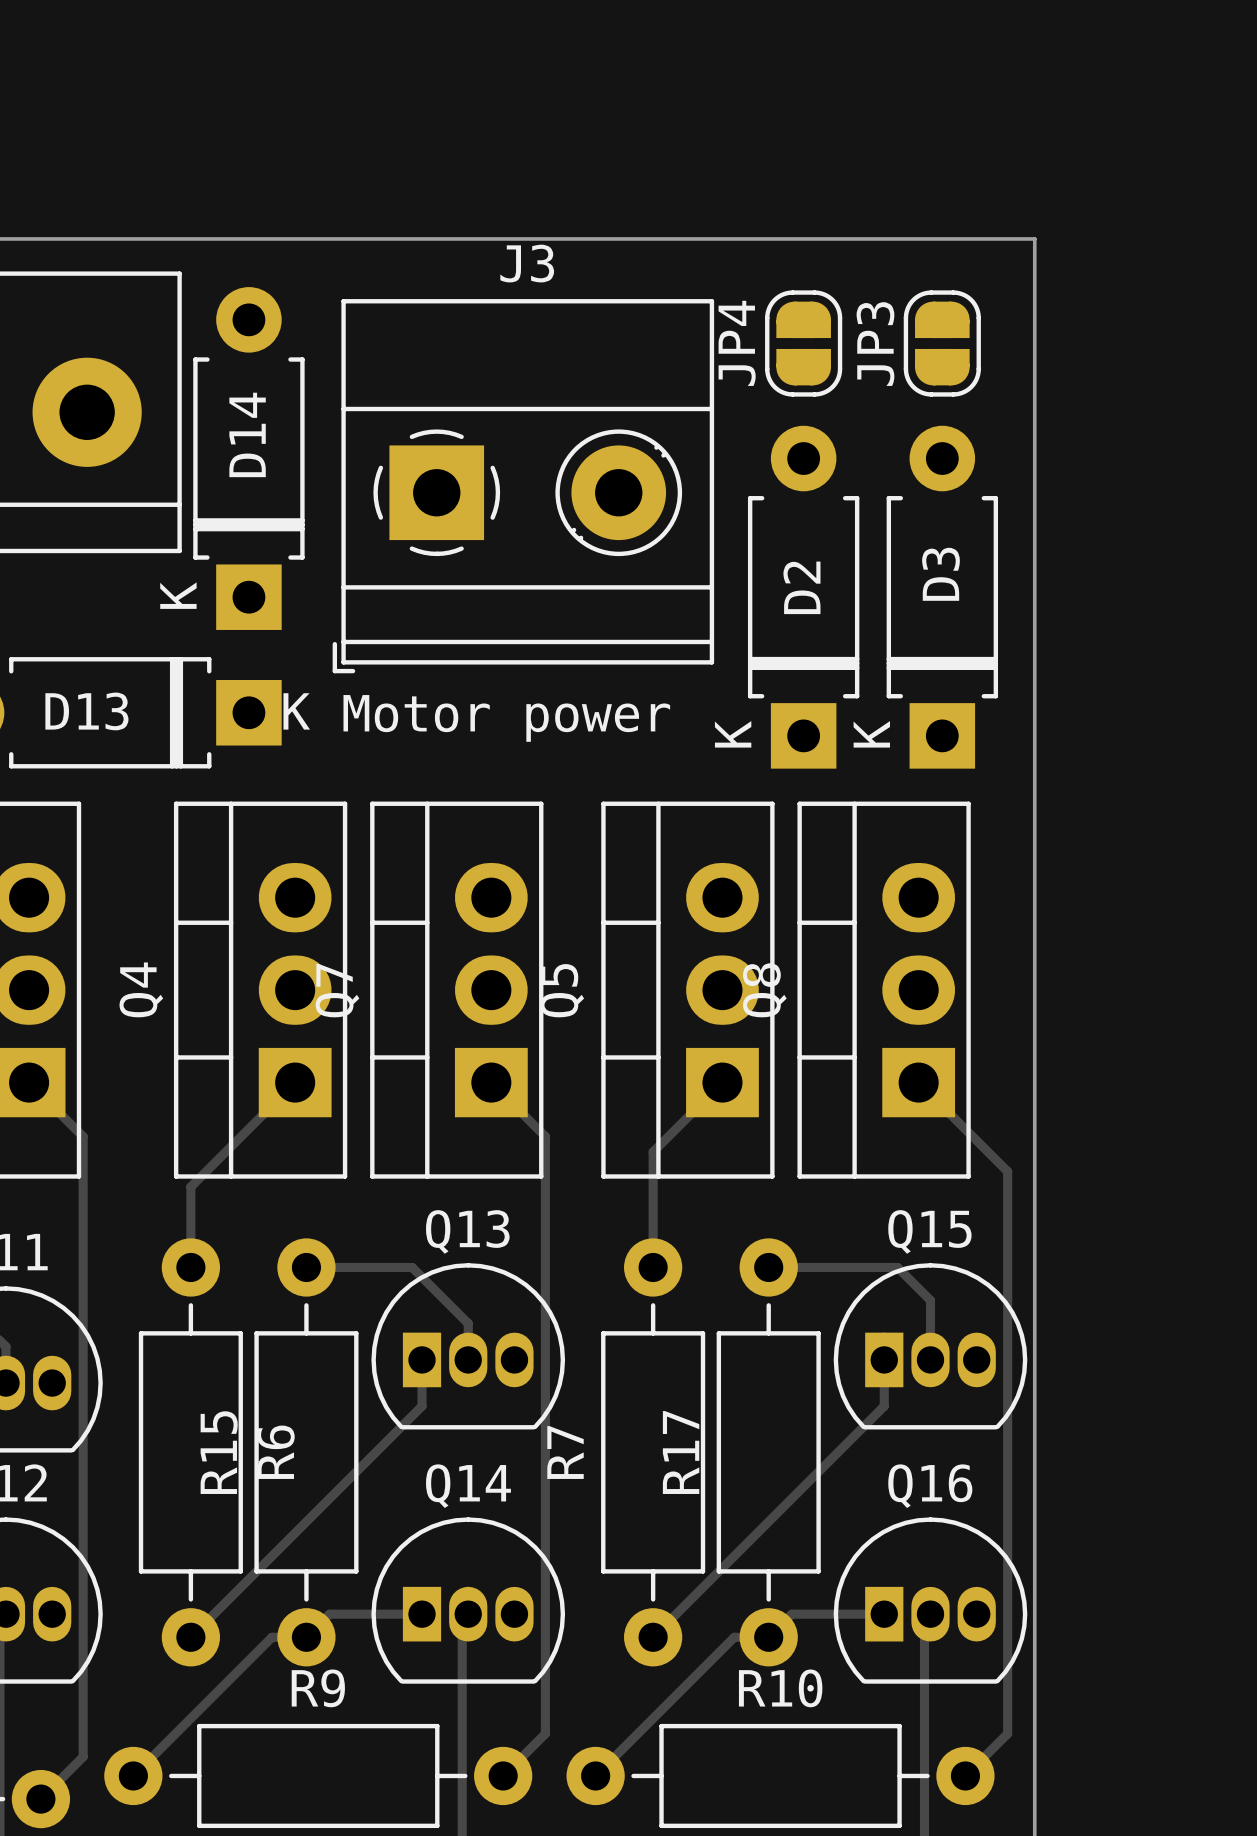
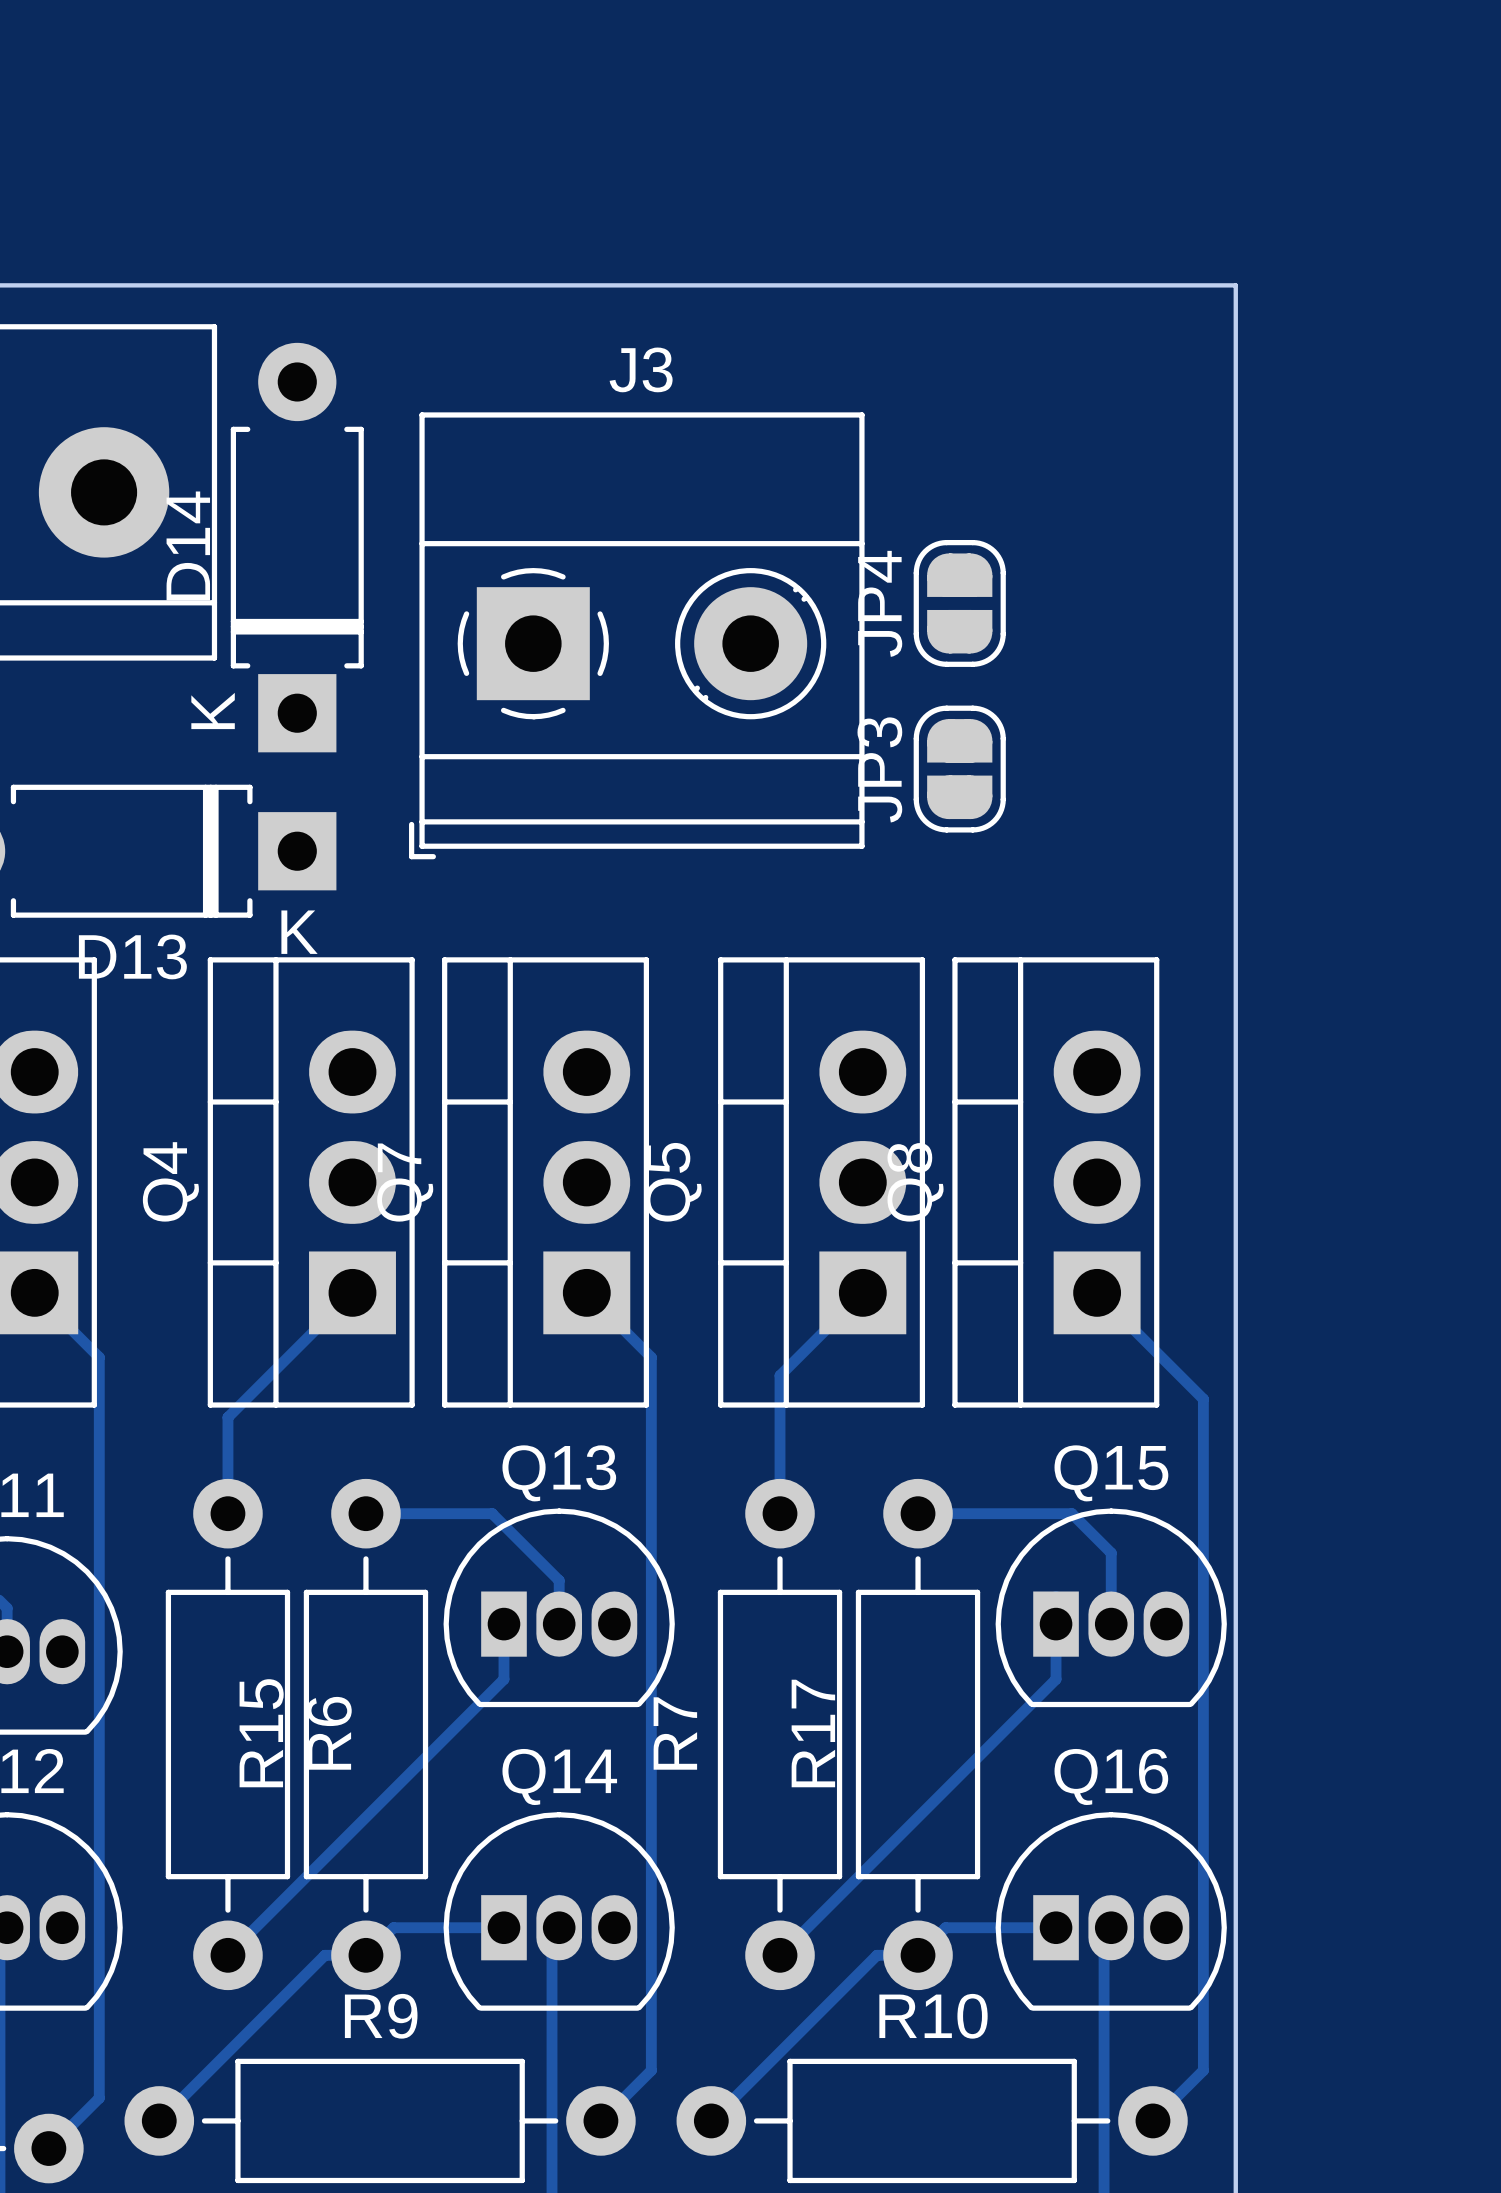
JP4 position: (803, 343) -> (959, 603)
JP3 position: (942, 343) -> (959, 769)
D14 name position: D14 (247, 434) -> D14 (188, 545)
J3 position: (523, 486) -> (636, 635)
D2: (803, 597) -> none
D3: (942, 597) -> none
D13 name position: D13 (86, 711) -> D13 (132, 956)
D13 text position: K (296, 711) -> K (299, 932)
text: Motor power (506, 718) -> none

